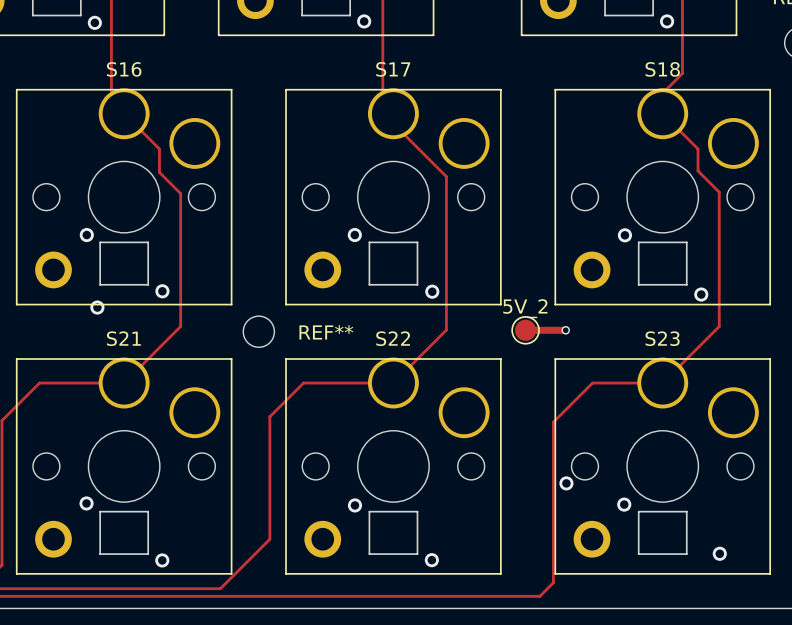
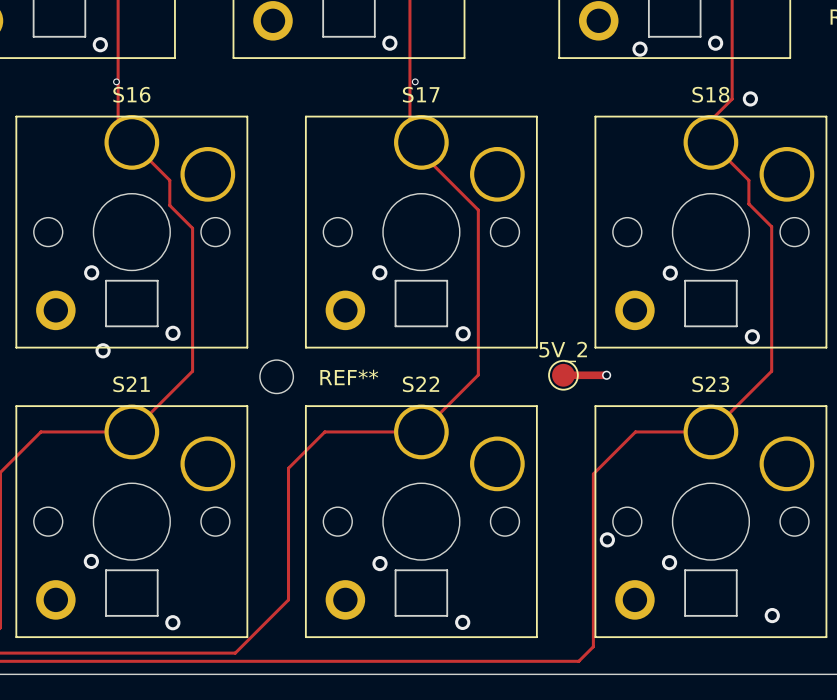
via: none -> (640, 49)
via: none -> (116, 81)
via: none -> (415, 81)
via: none -> (750, 98)

